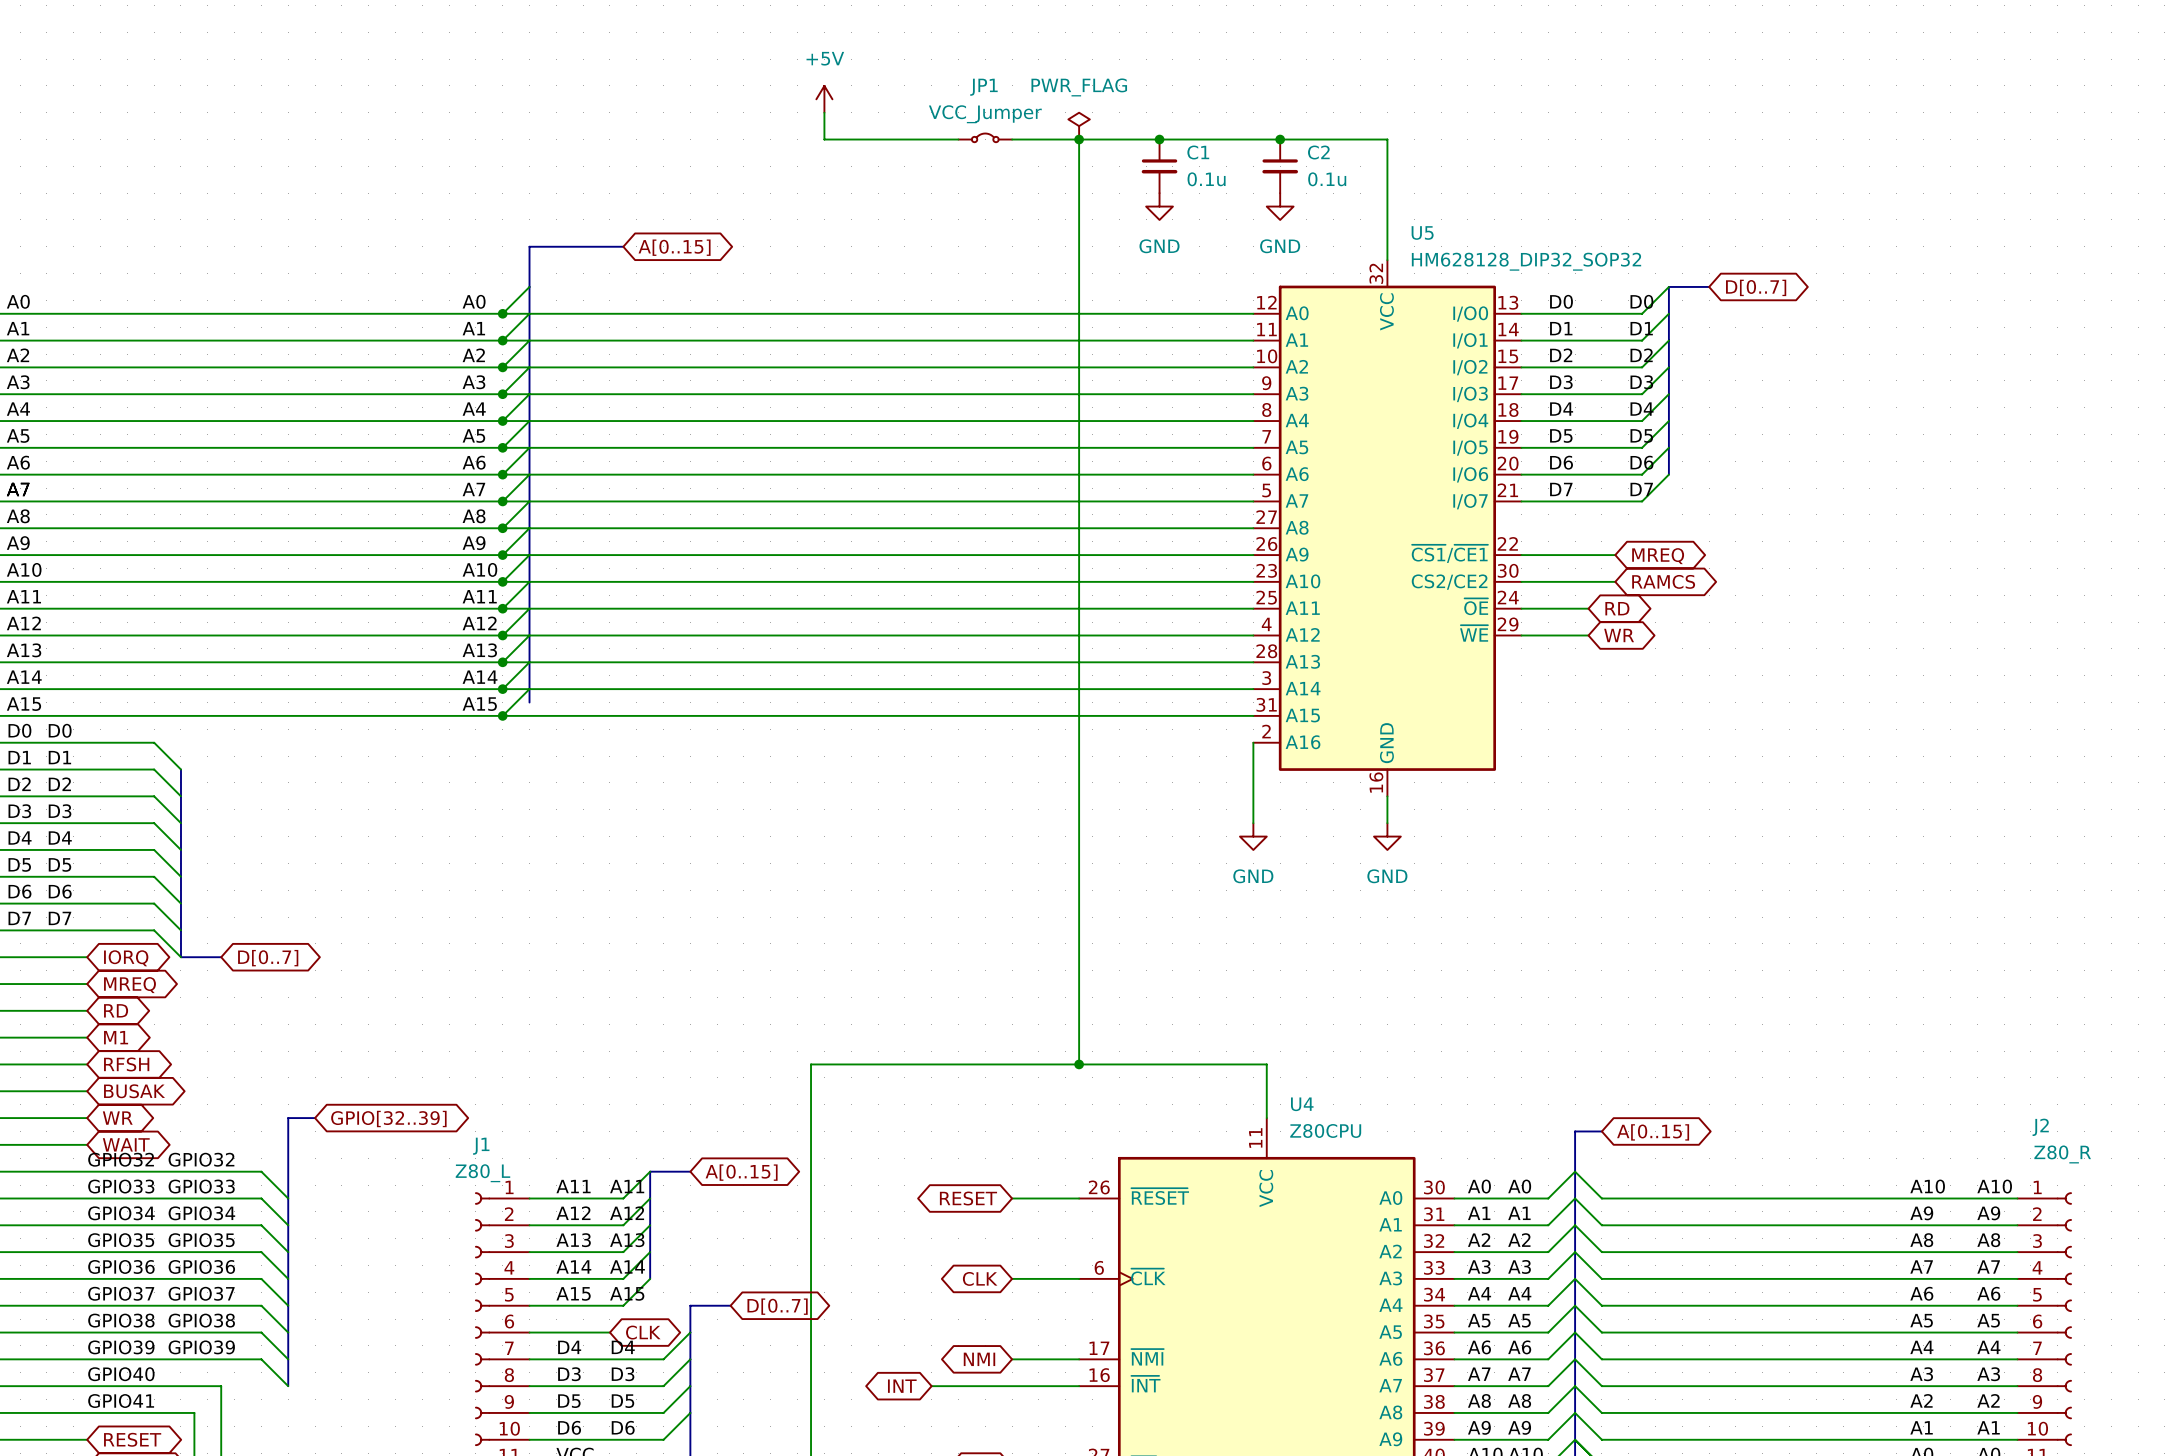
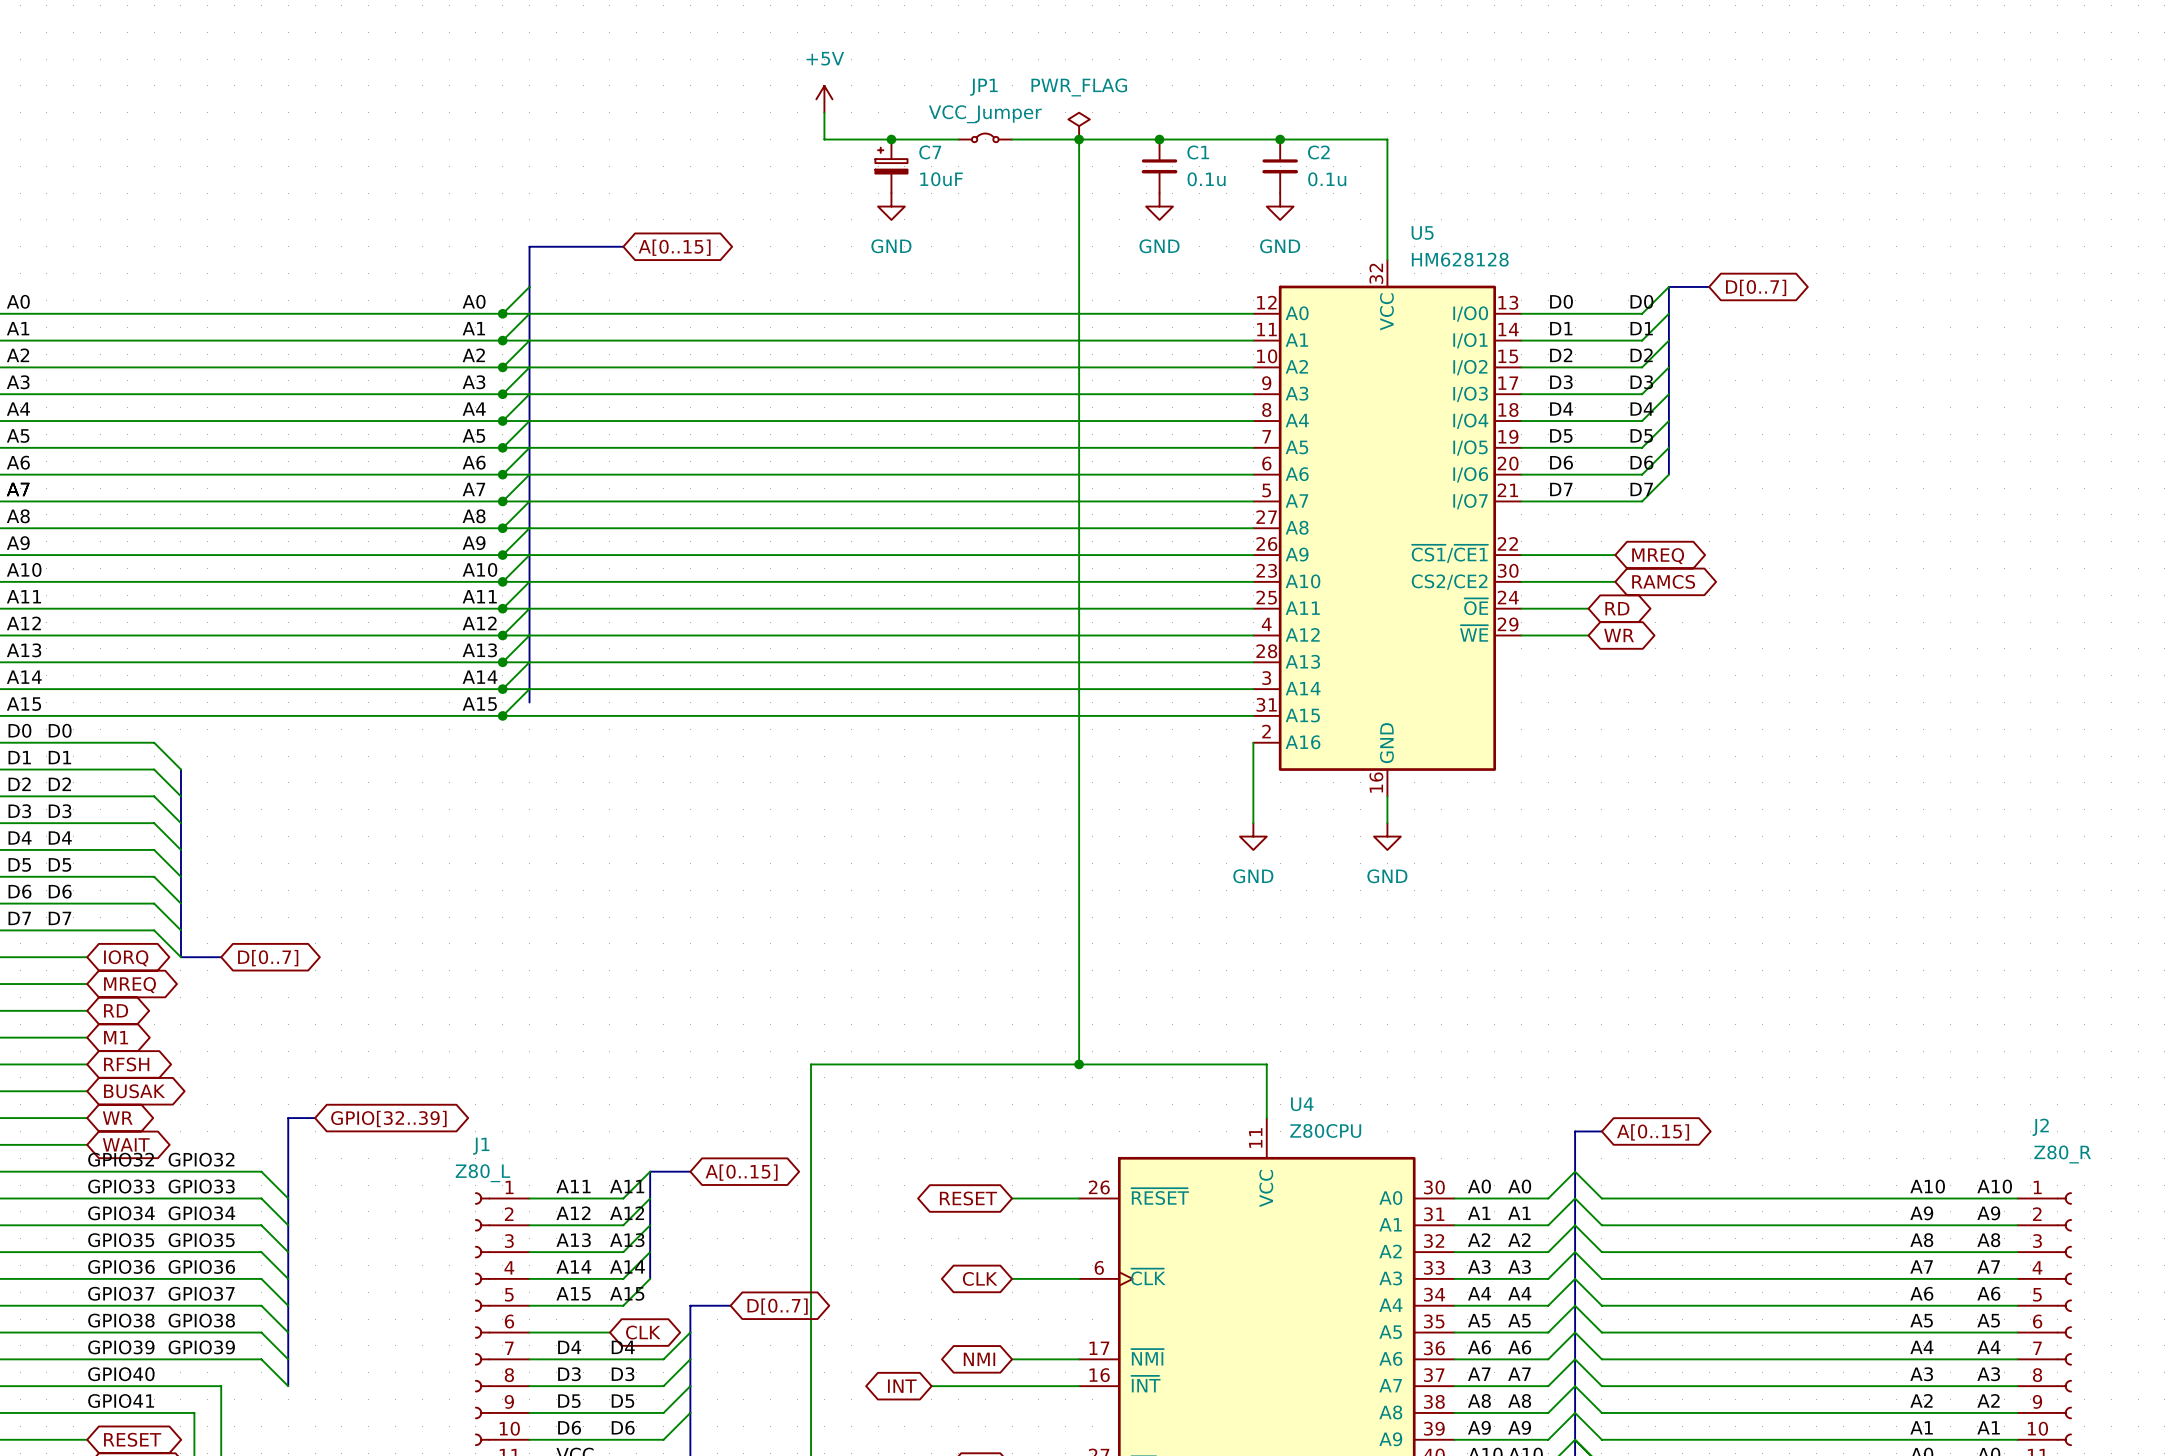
junction: none -> (891, 139)
C7: none -> 10uF (891, 166)
power symbol: none -> GND (891, 206)
U5 value: HM628128_DIP32_SOP32 (1526, 261) -> HM628128 (1460, 259)

